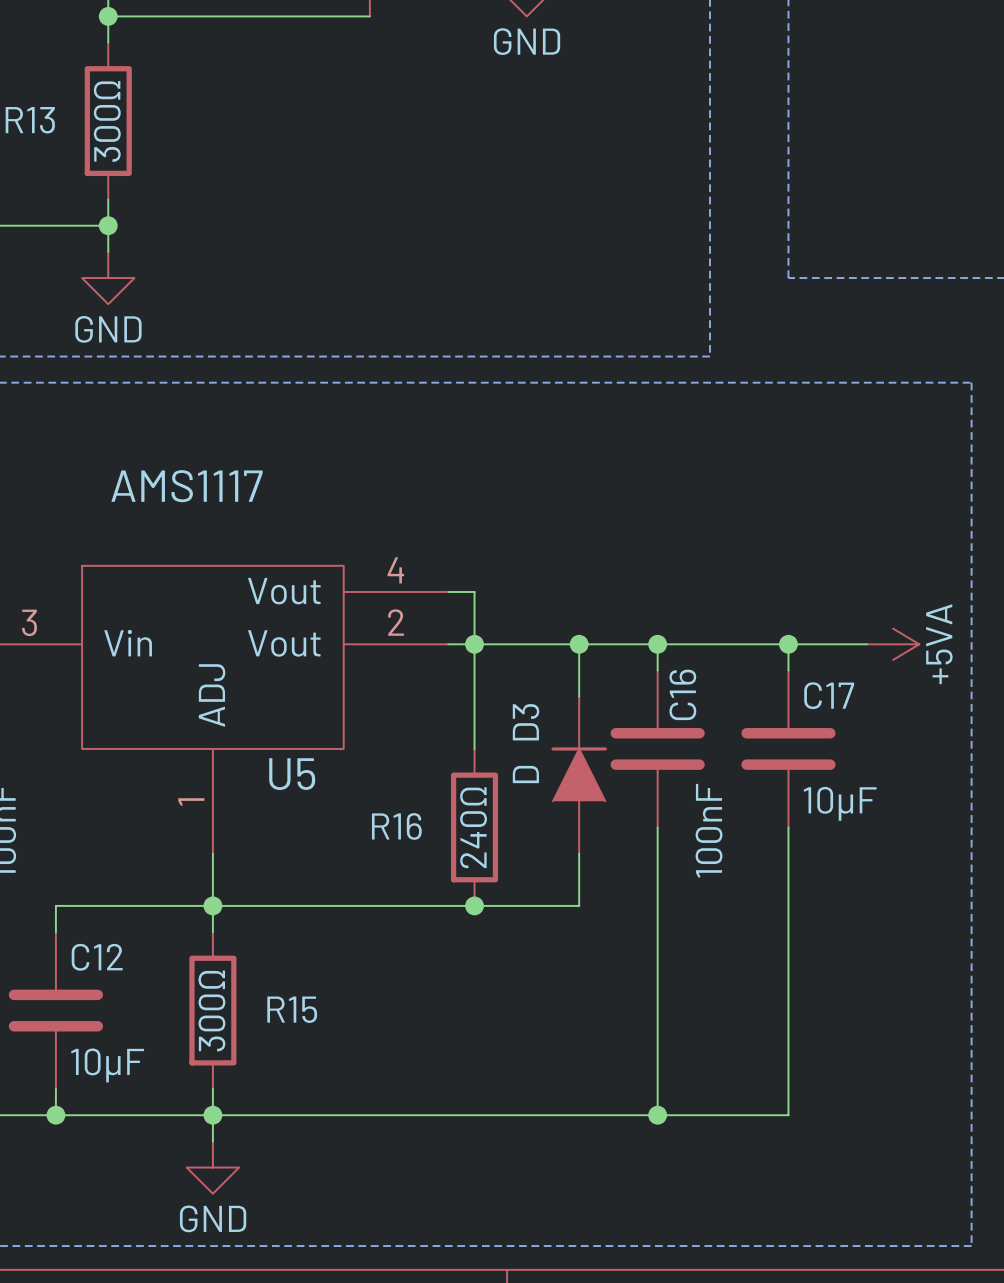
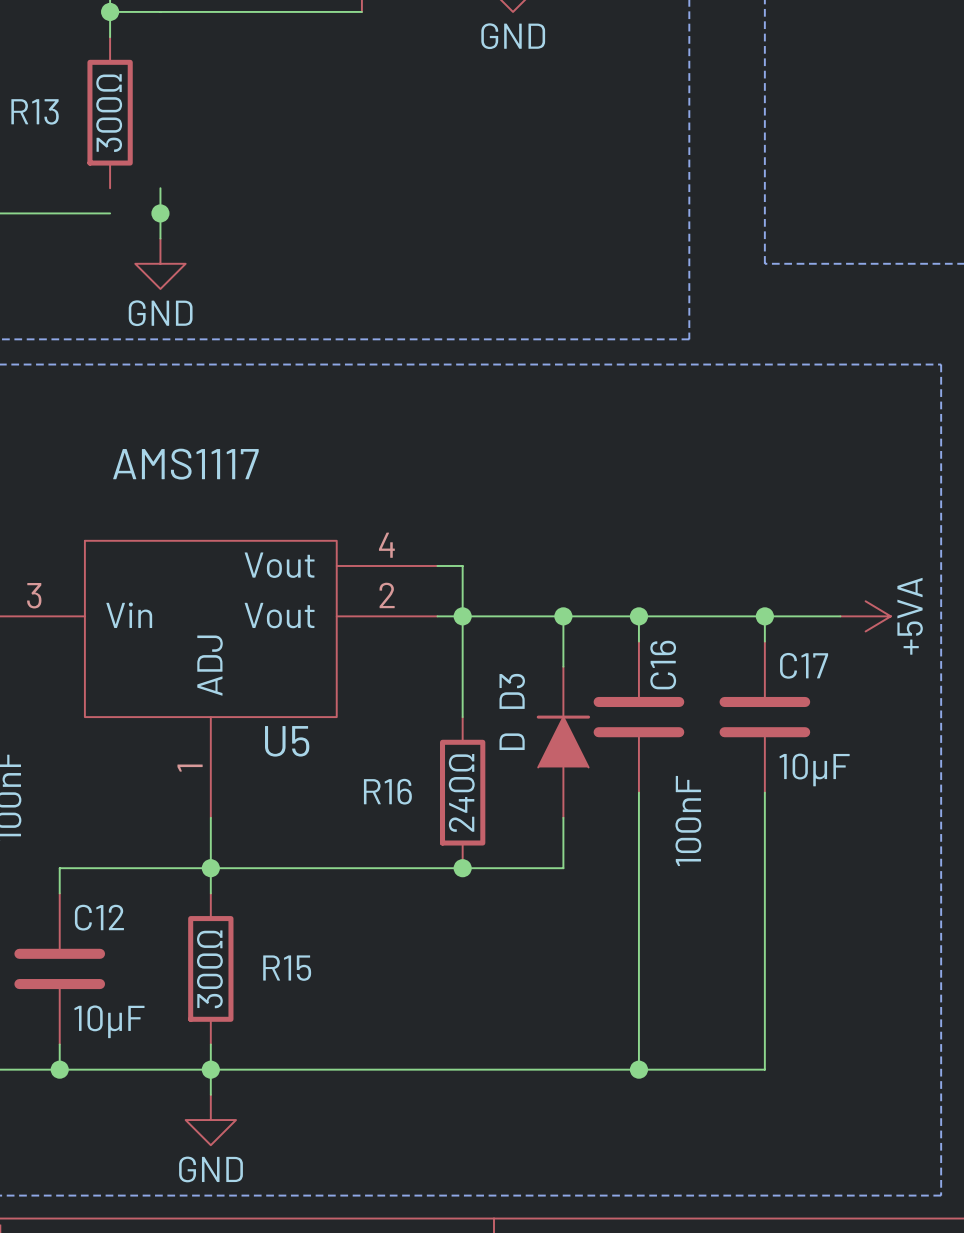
wire: (108, 199) (108, 251) -> (160, 188) (160, 238)
junction position: (108, 225) -> (160, 213)
power symbol position: GND (108, 278) -> GND (160, 263)
C16 value position: 100nF (709, 830) -> 100nF (688, 821)

